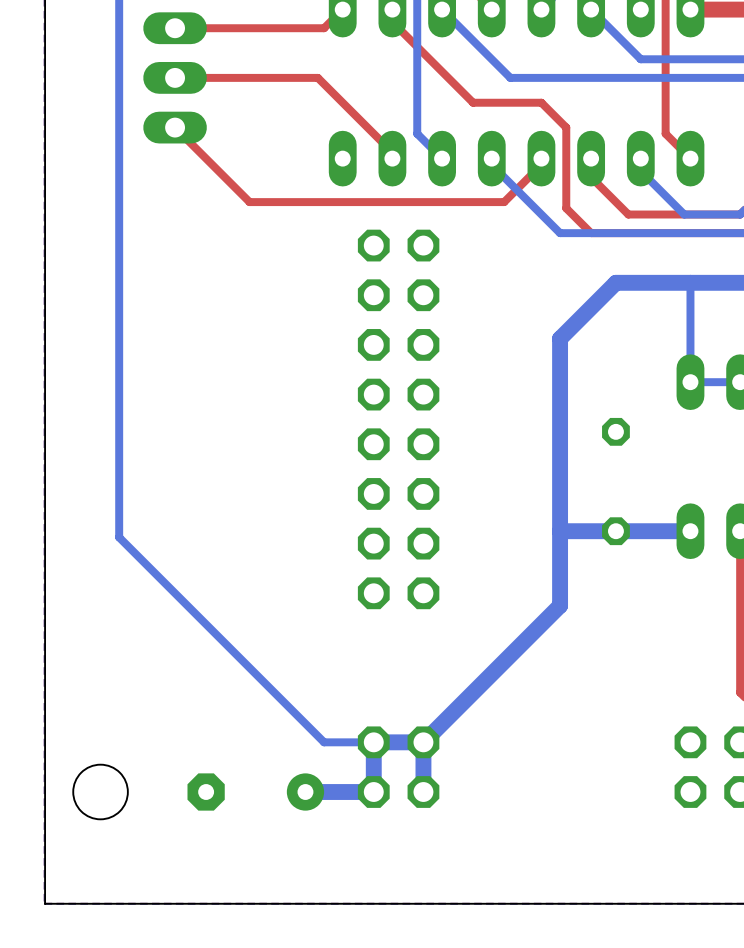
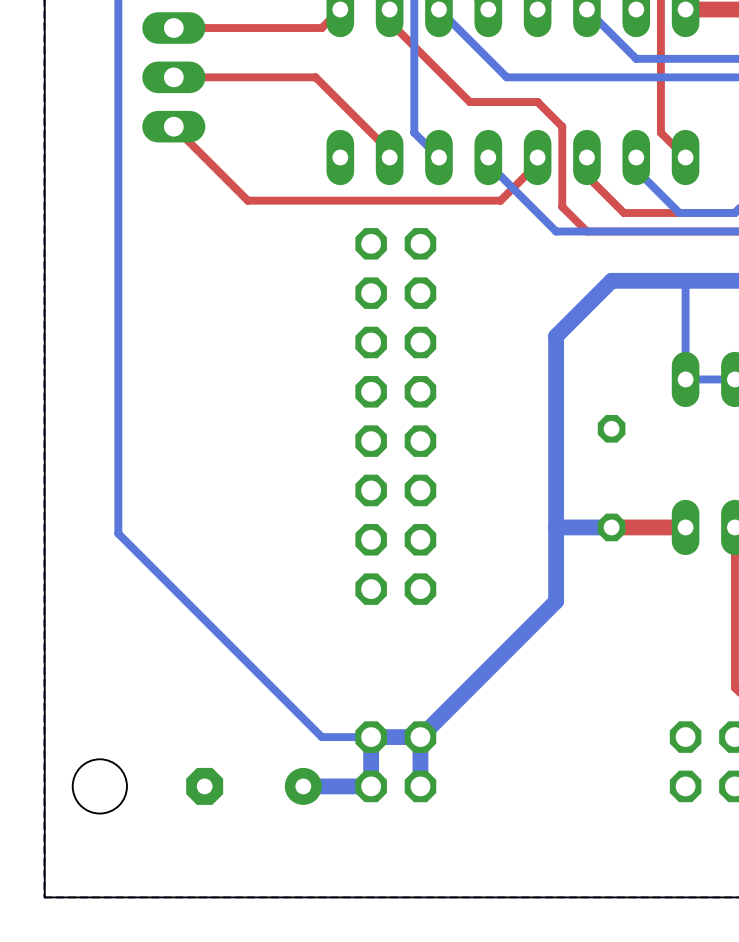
bottom track: (690, 531) (615, 531) -> none
top track: none -> (685, 527) (611, 527)

